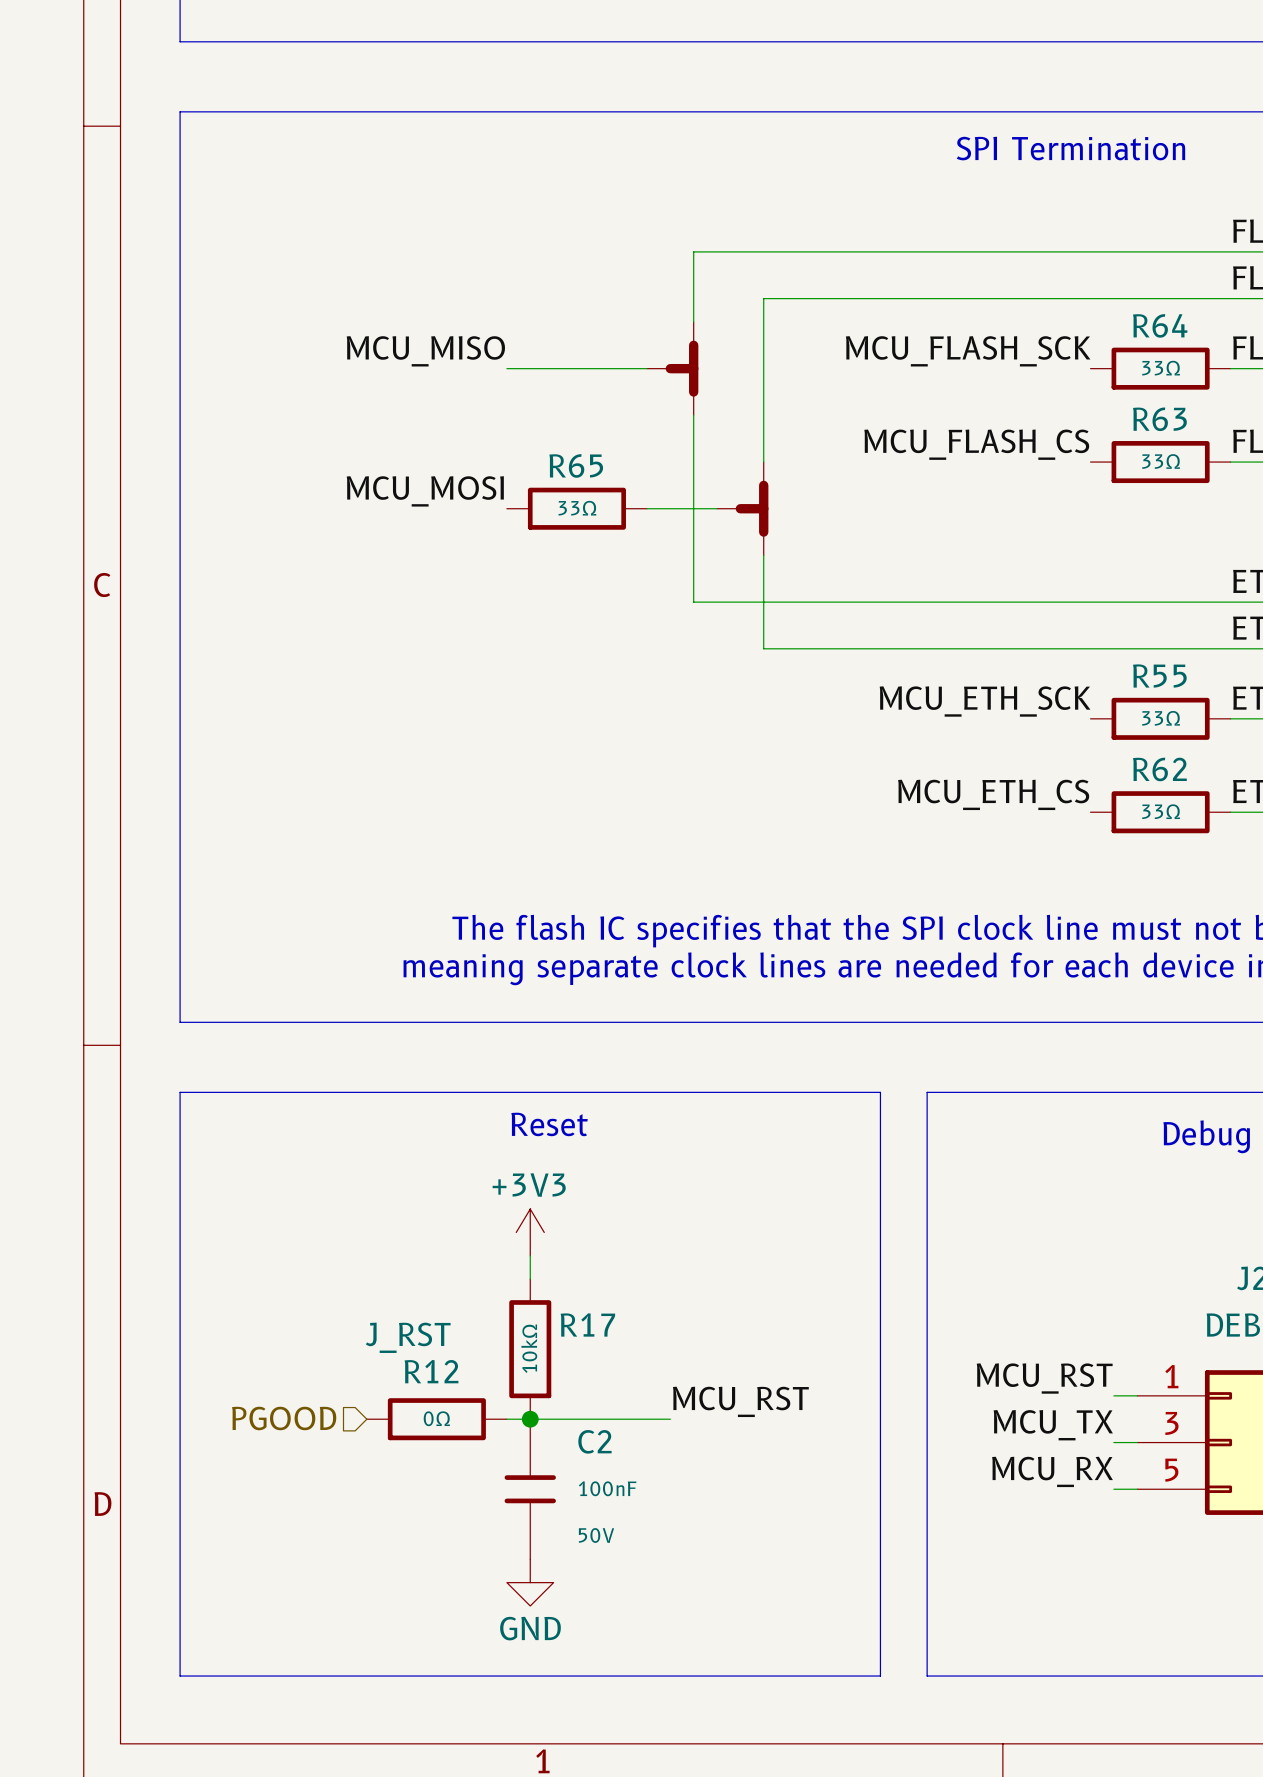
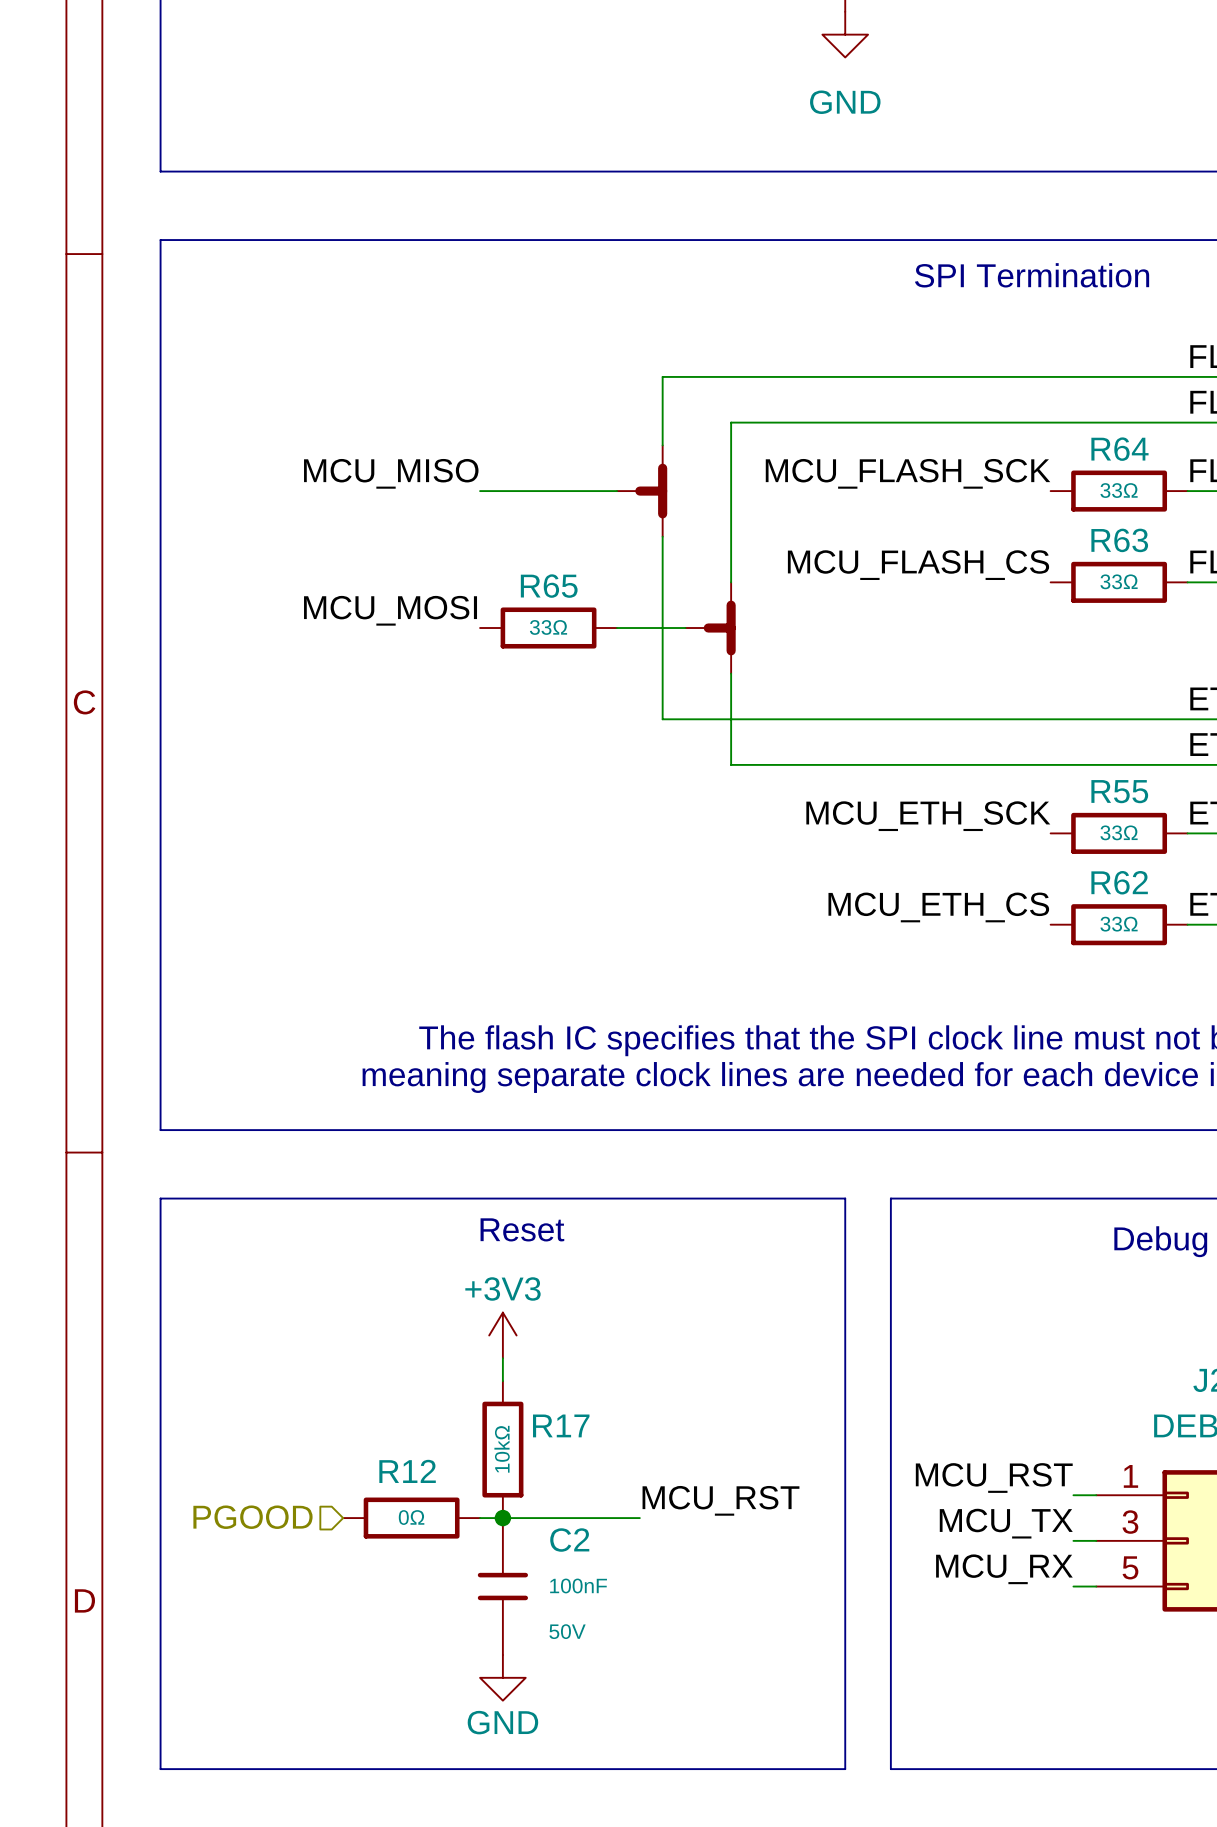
R12 text: J_RST (408, 1337) -> none

